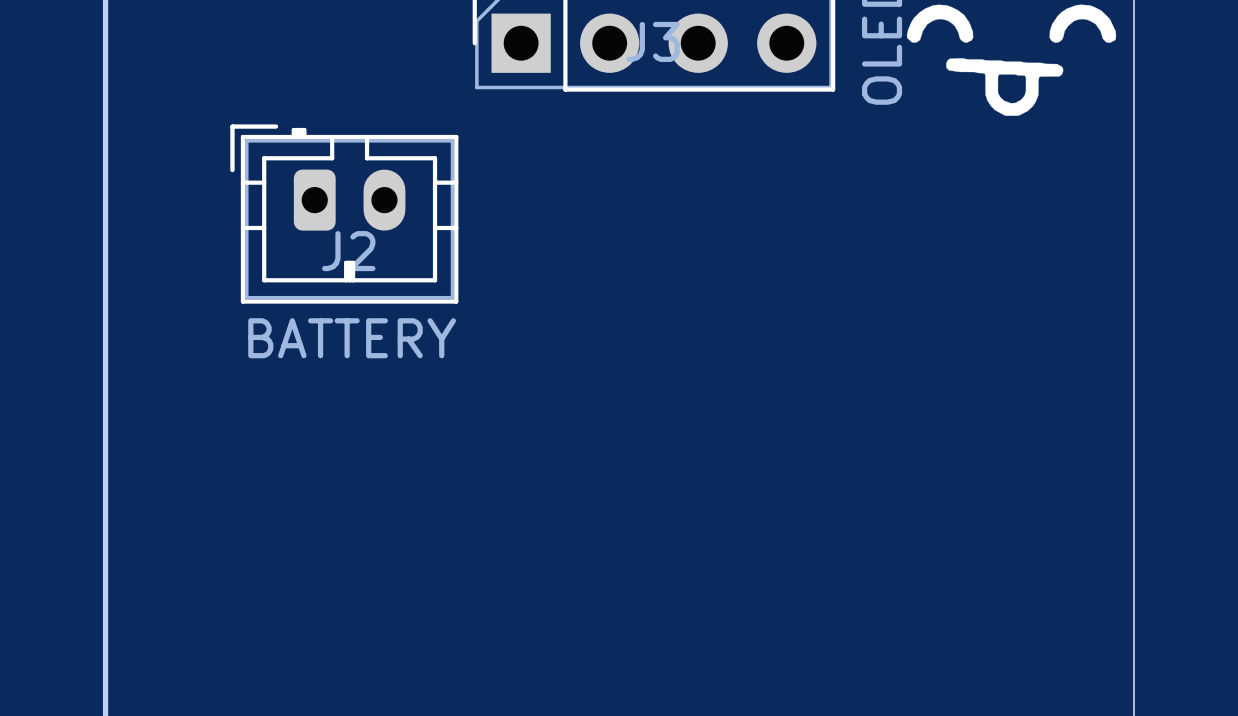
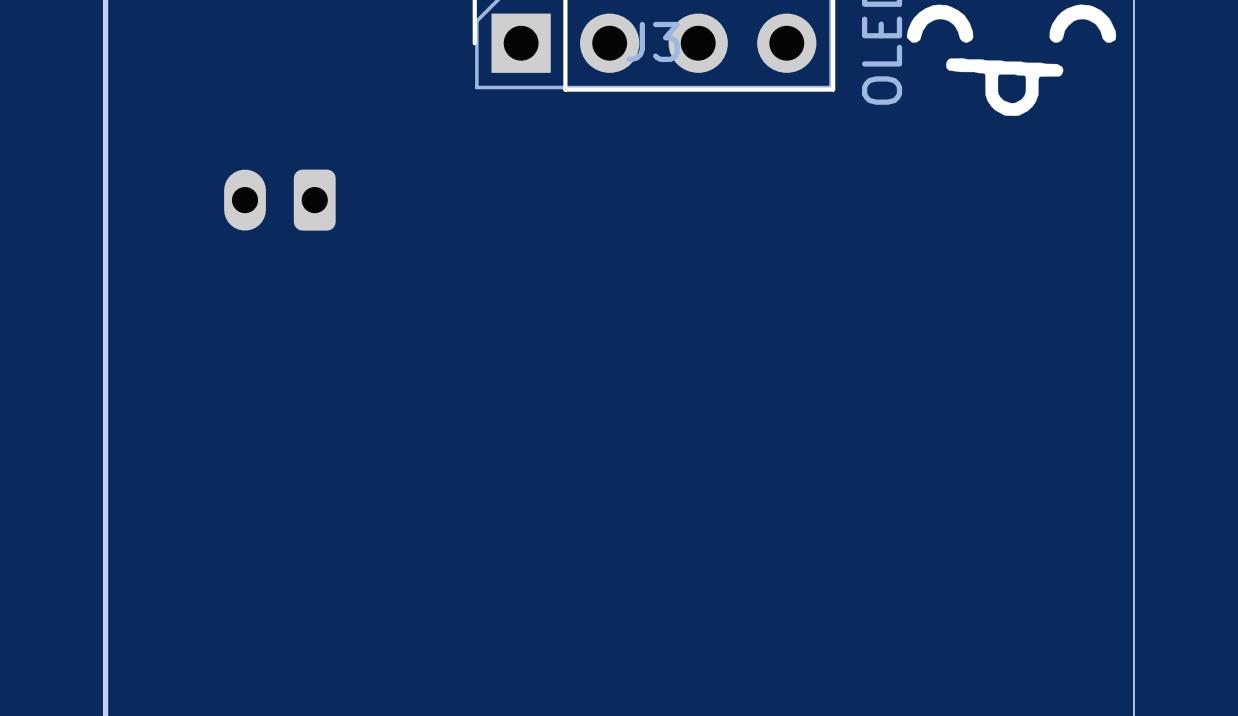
J2 side: top (344, 214) -> bottom (279, 200)

